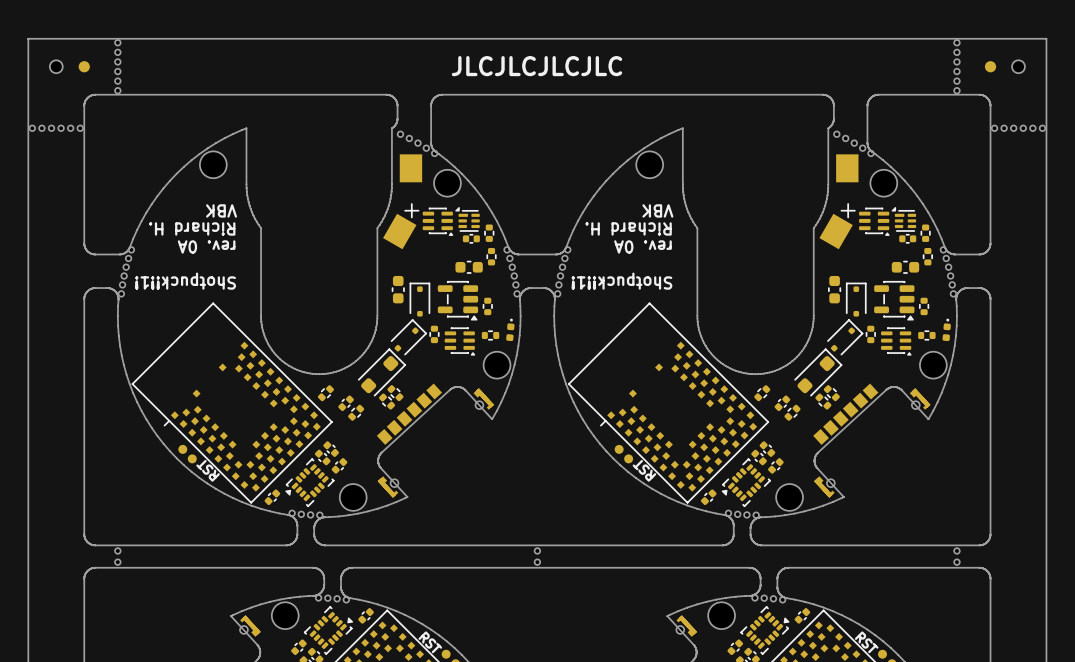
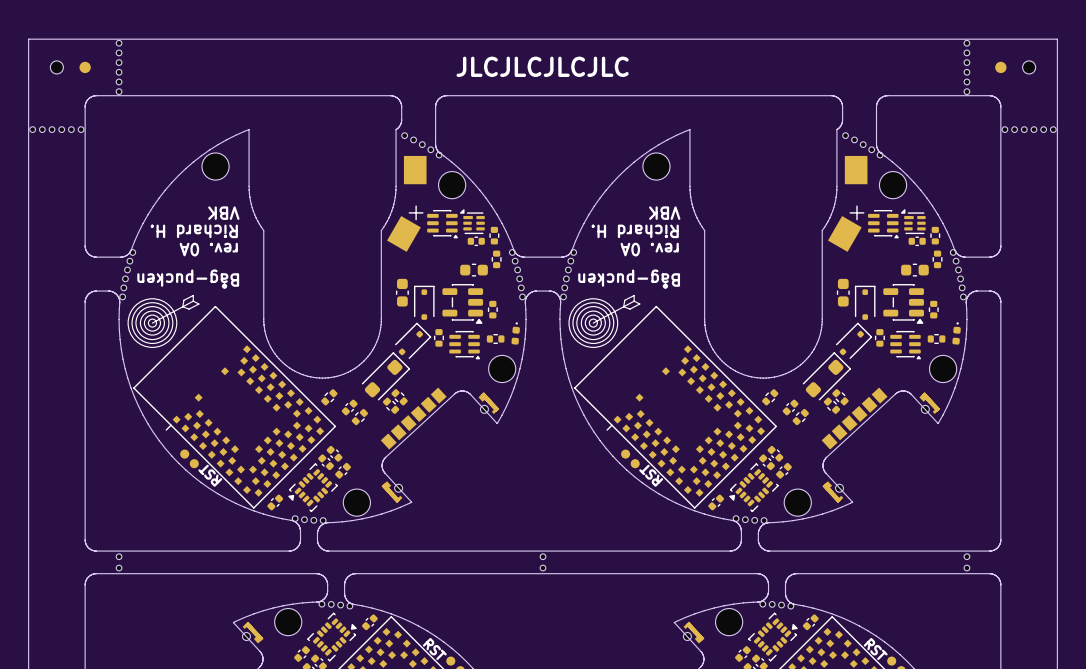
text: Shotpuck!!1! (185, 281) -> Båg-pucken (188, 279)
text: Shotpuck!!1! (621, 281) -> Båg-pucken (629, 279)
drawing: none -> [127, 298, 178, 348]
drawing: none -> [568, 298, 619, 348]
line: none -> (193, 301) (152, 323)
line: none -> (193, 301) (193, 295) (183, 300) (182, 306) (189, 309) (198, 303) (193, 301)
line: none -> (634, 301) (593, 323)
line: none -> (634, 301) (634, 295) (624, 300) (623, 306) (629, 309) (639, 303) (634, 301)

